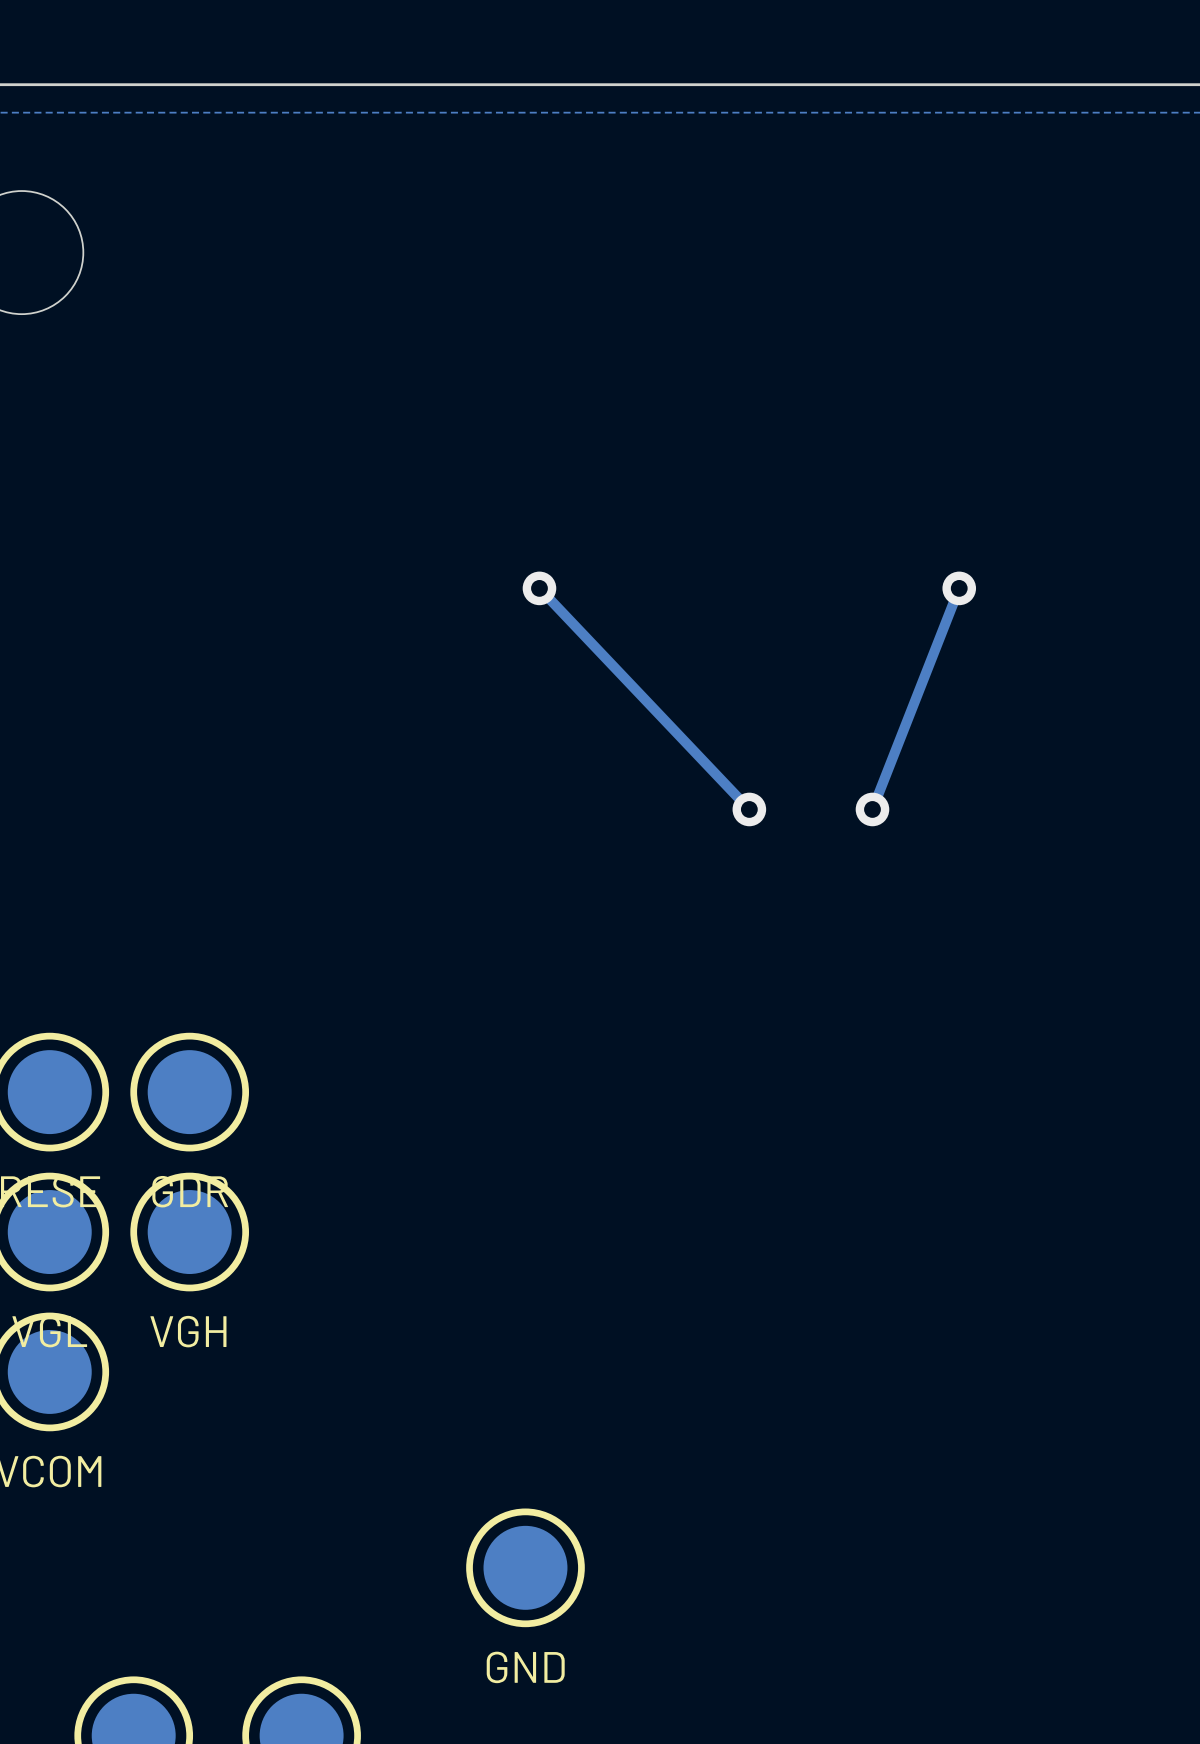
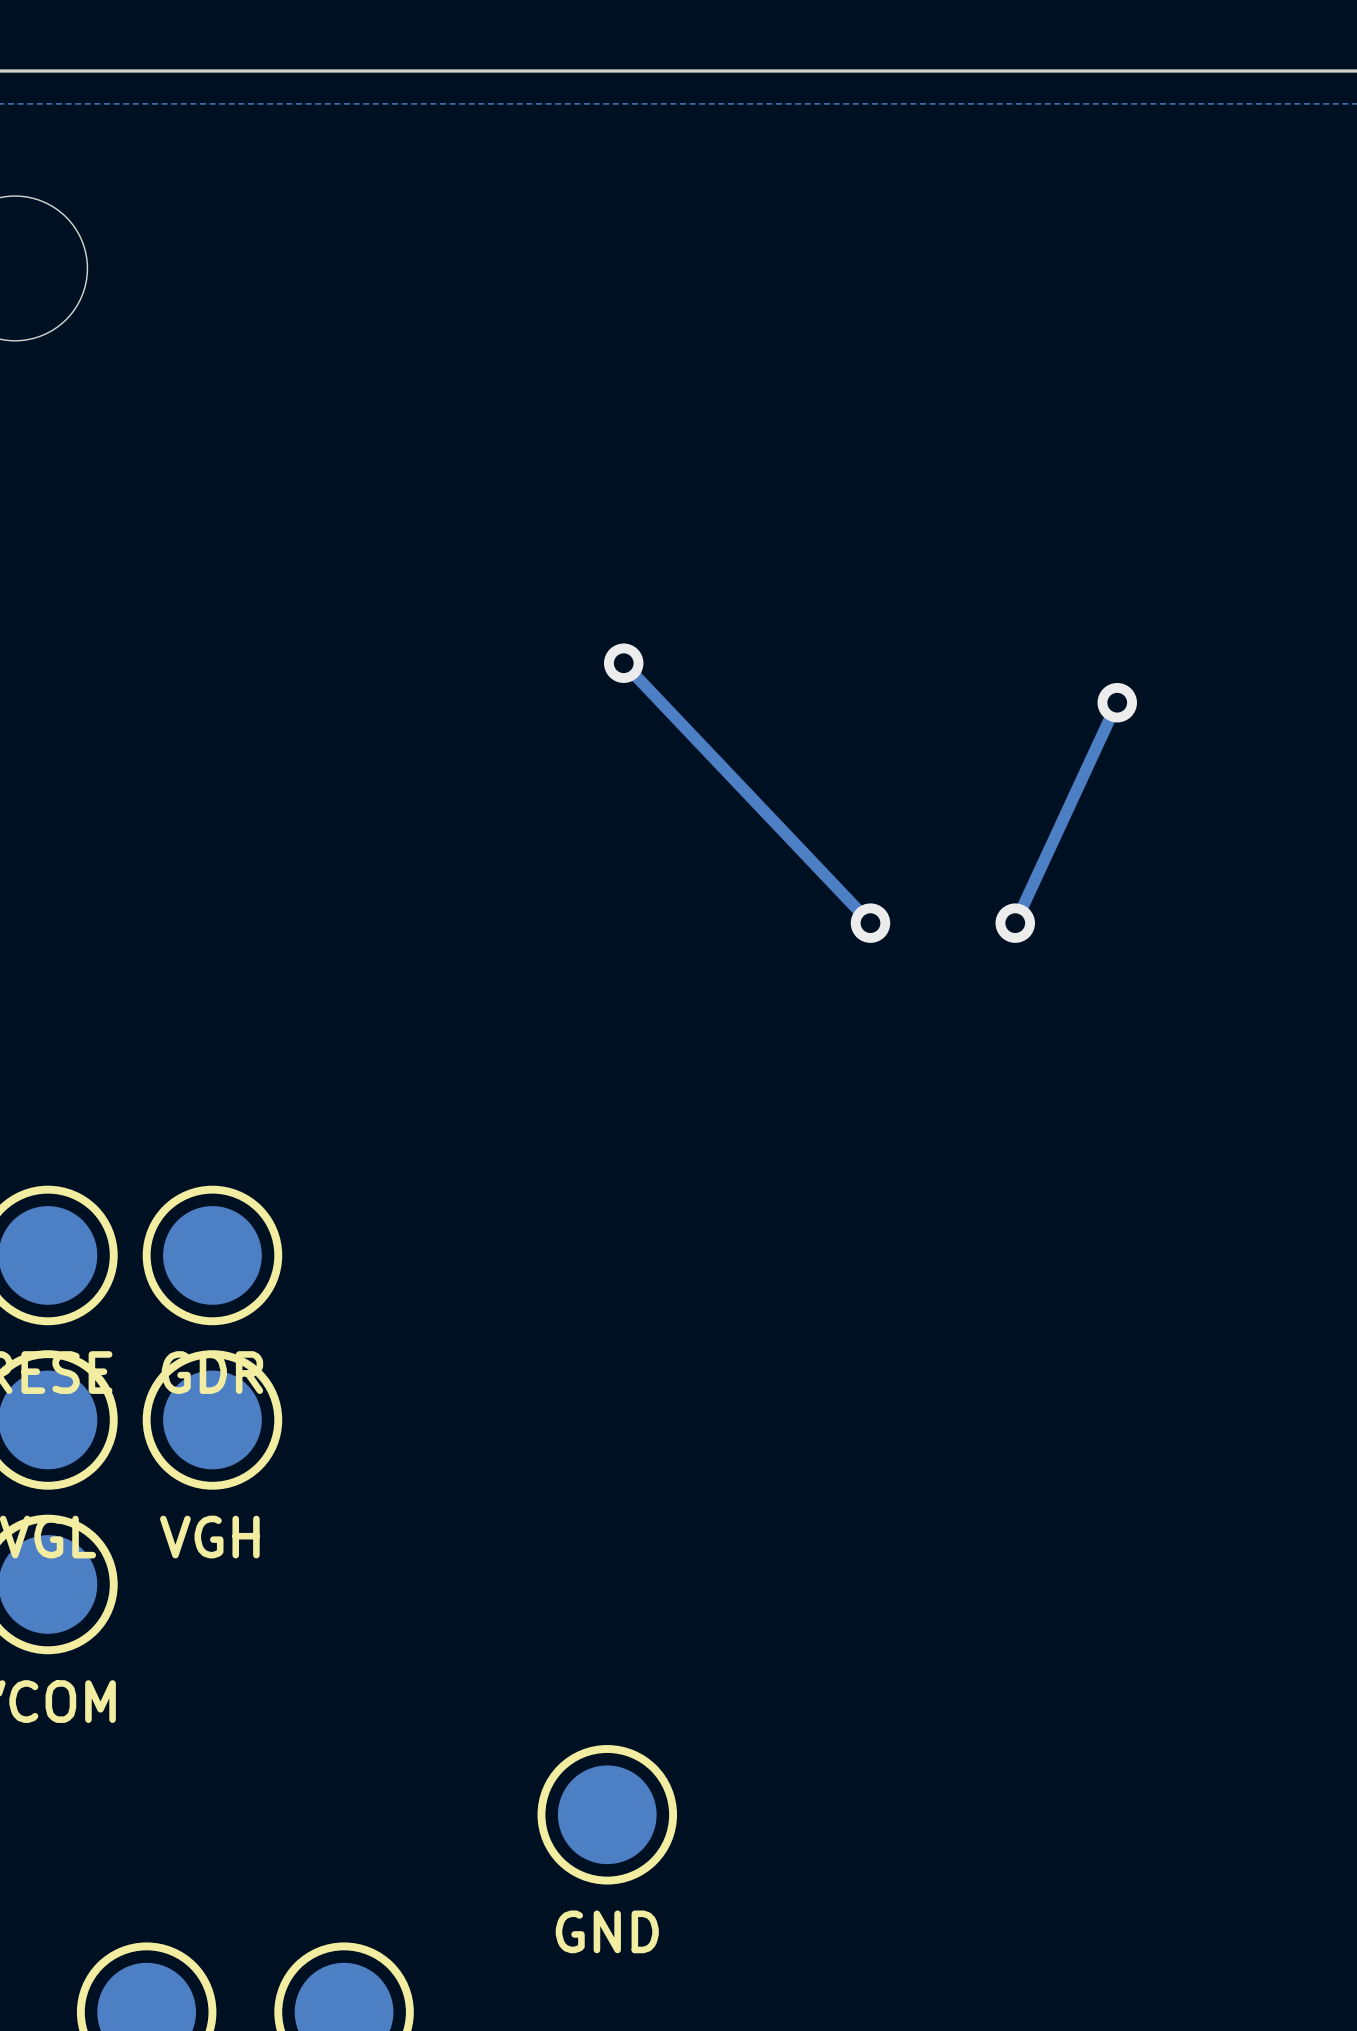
track: (959, 588) (872, 809) -> (1117, 702) (1015, 923)
via position: (959, 588) -> (1117, 702)

